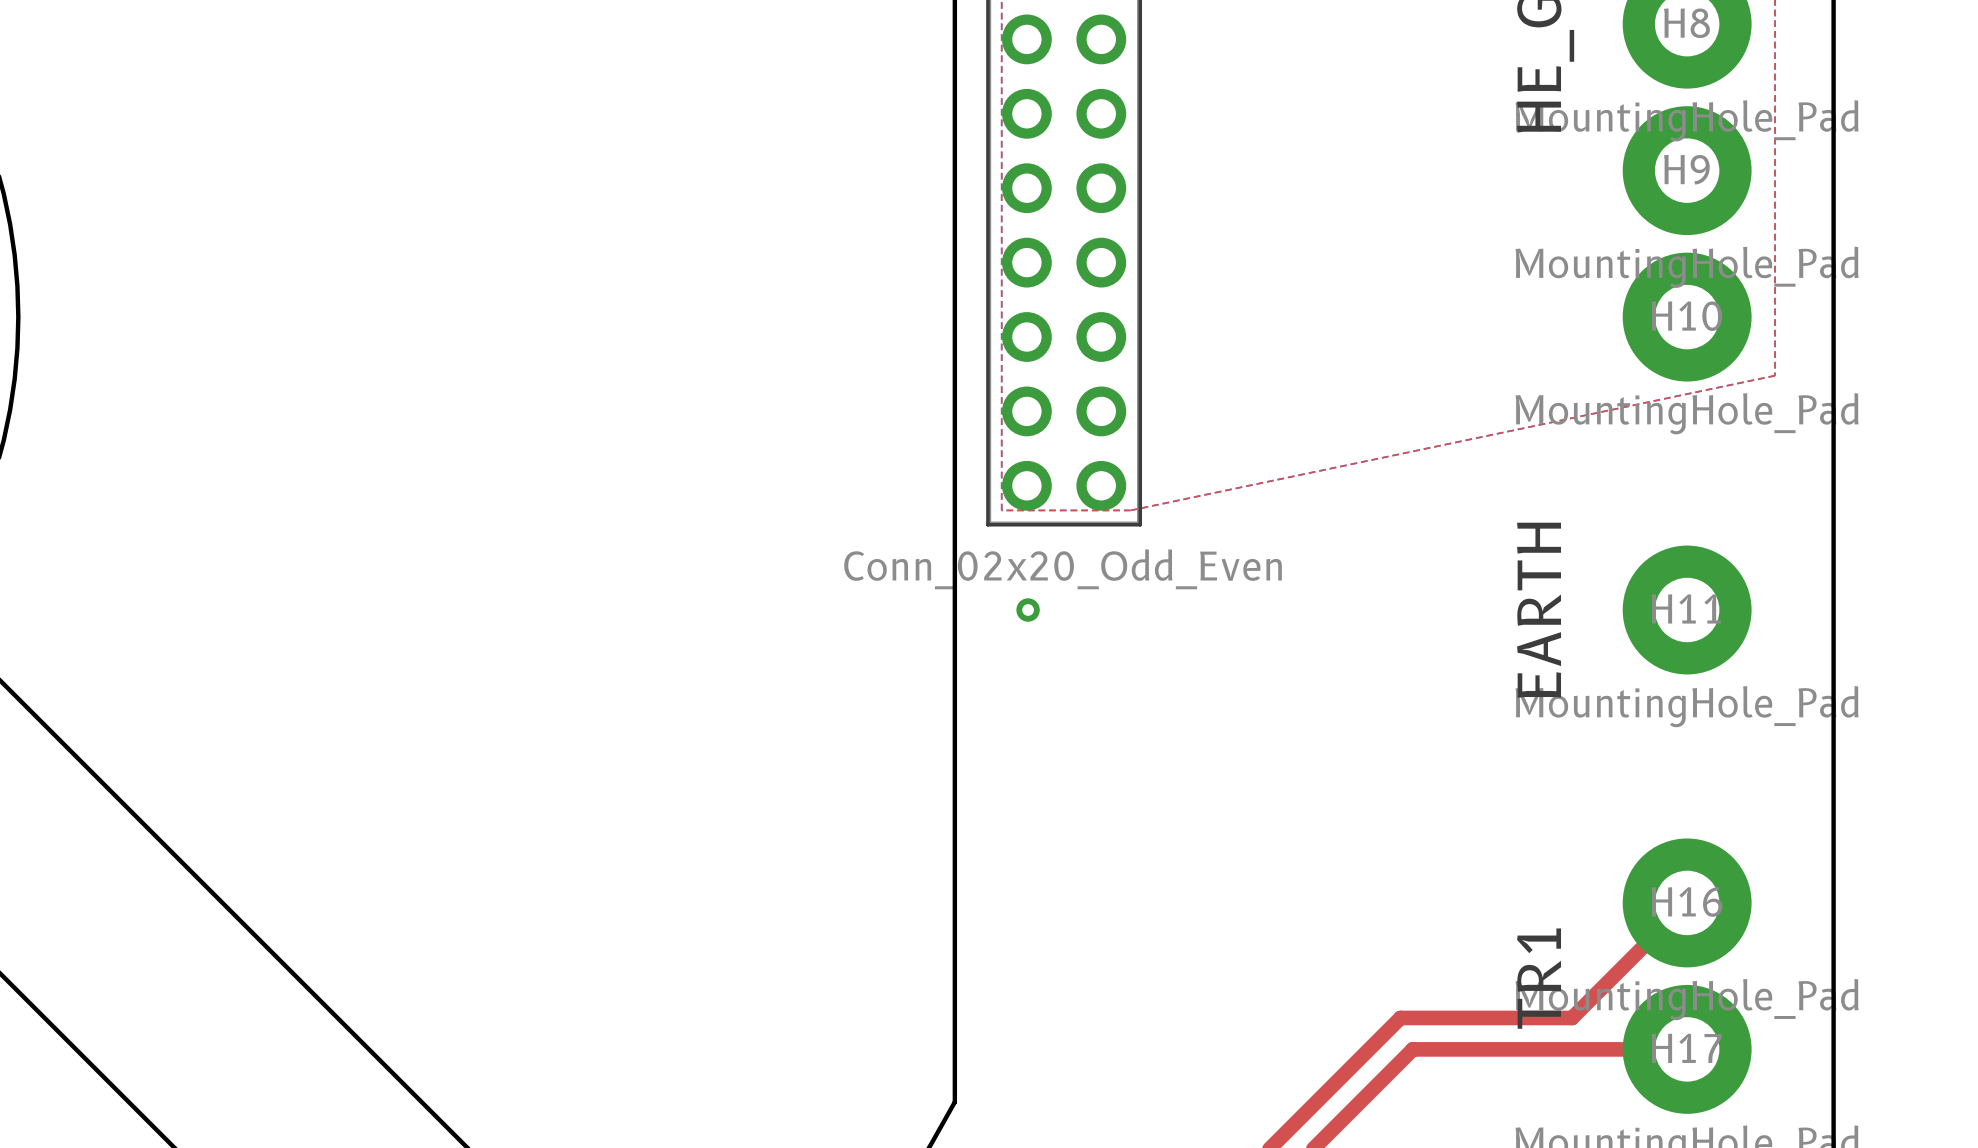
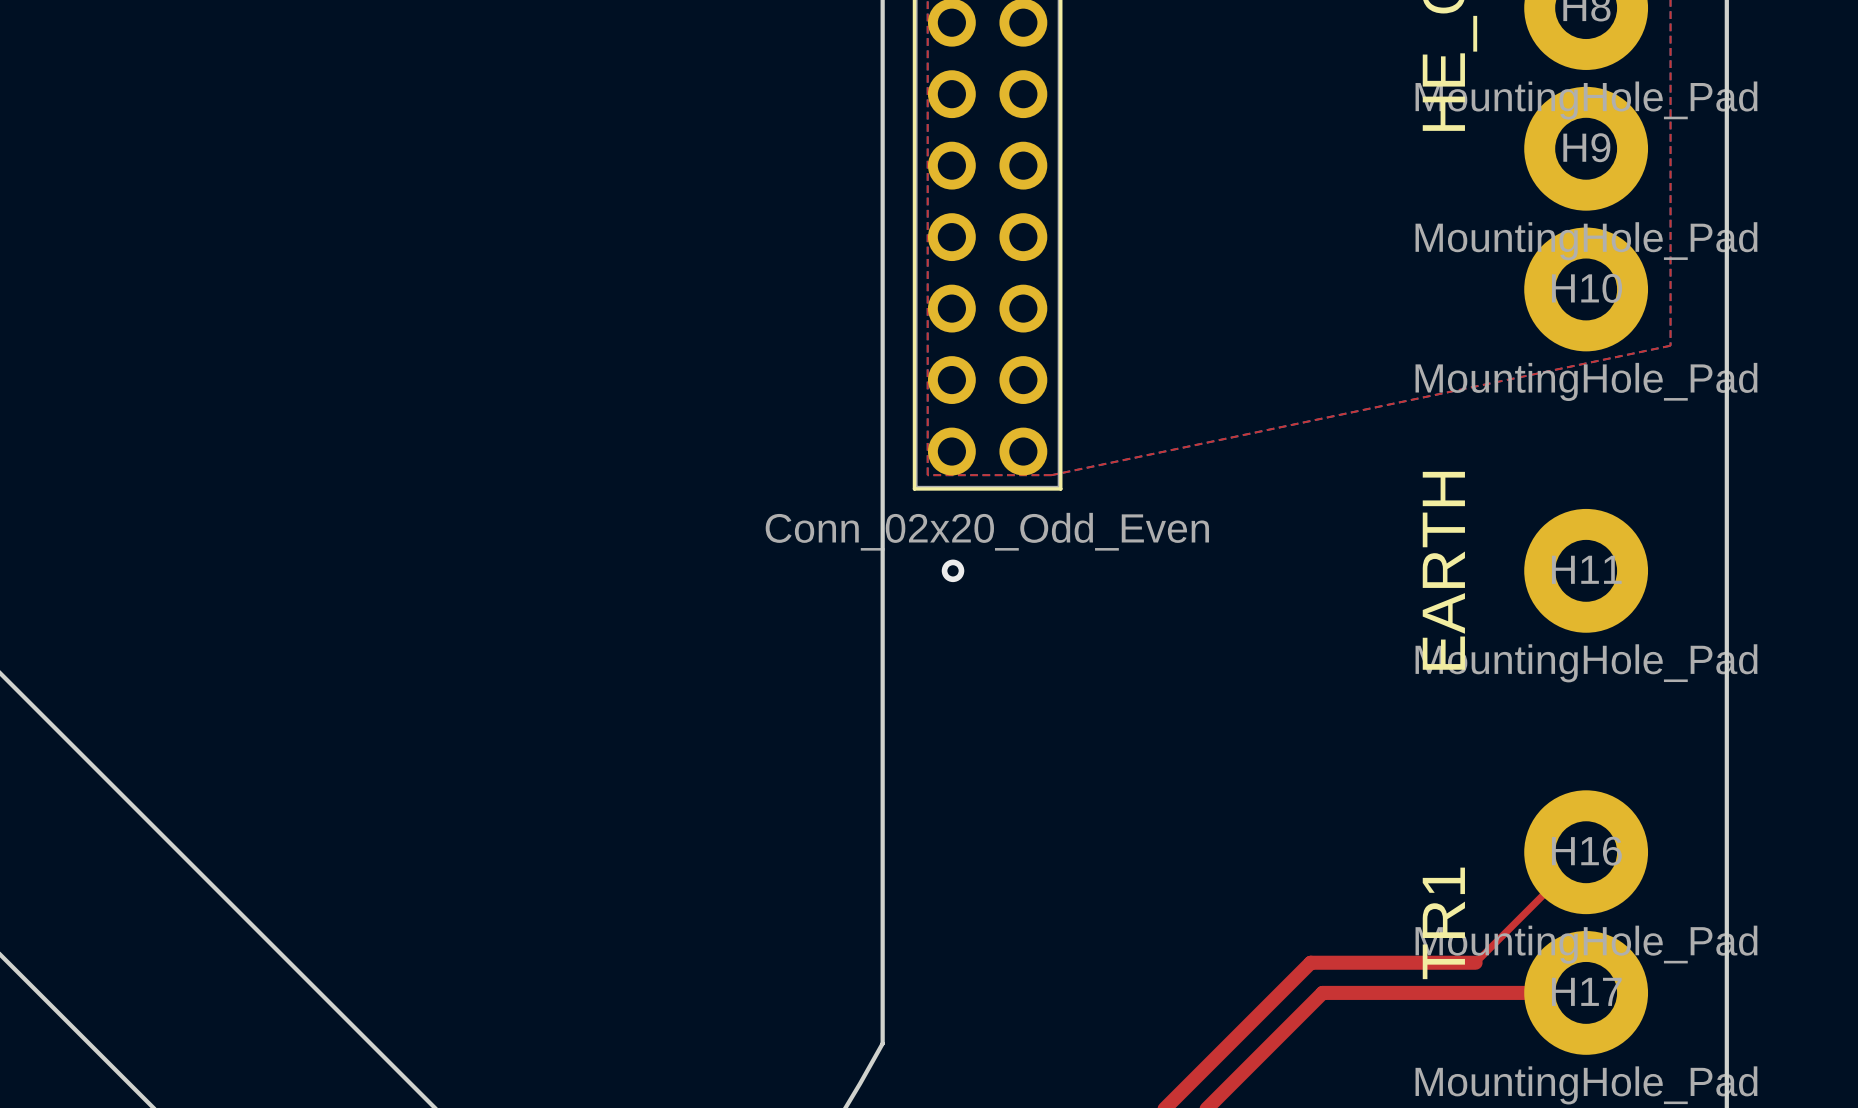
top track width: thick (1687, 902) (1572, 1017) -> thin (1586, 852) (1475, 962)

